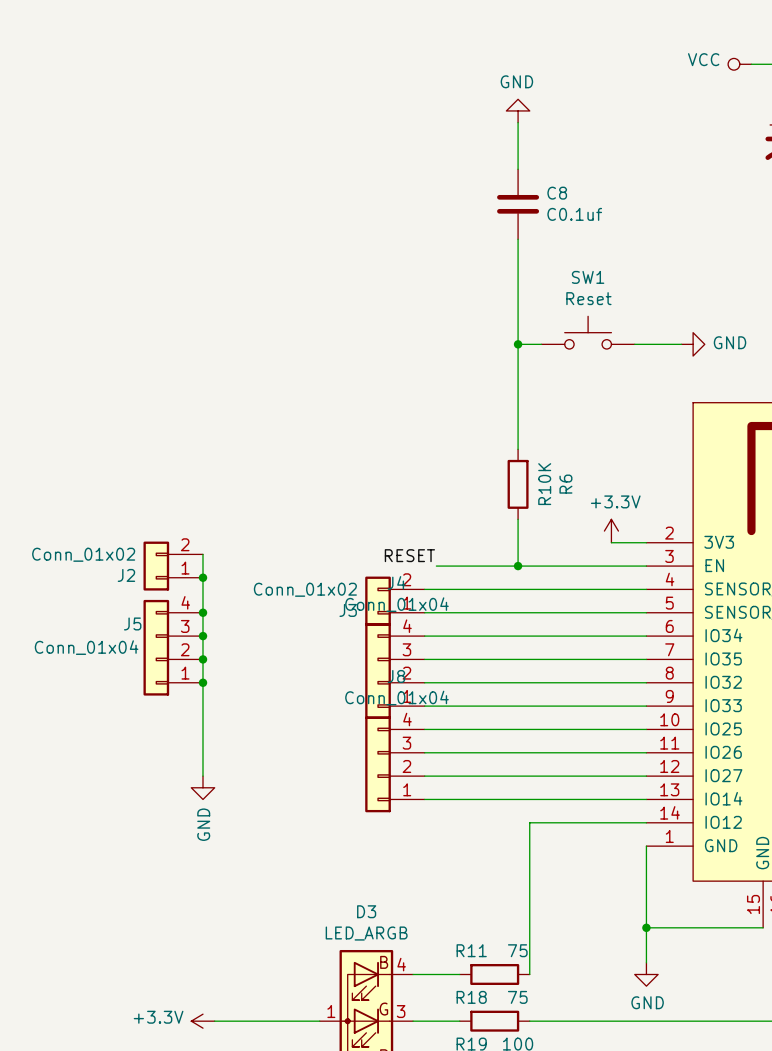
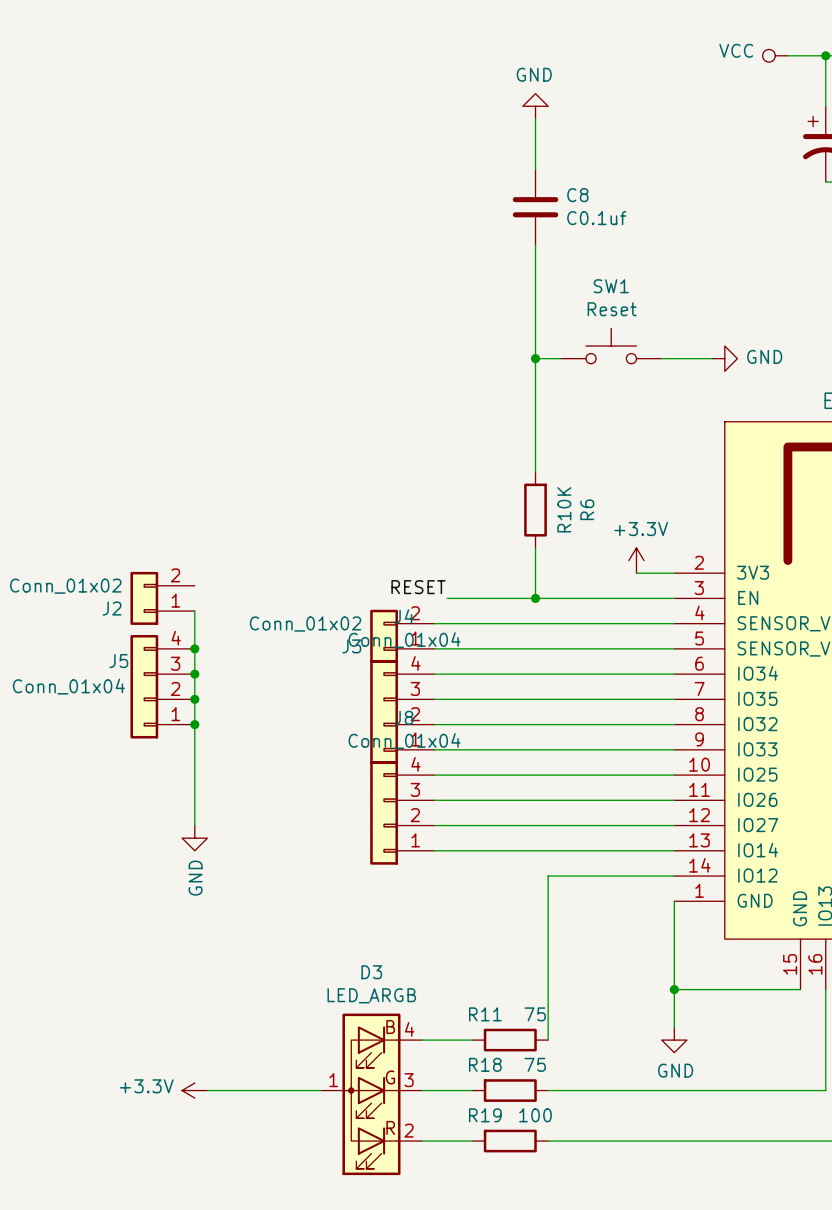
wire: (202, 554) (202, 577) -> none
junction: (202, 577) -> none

